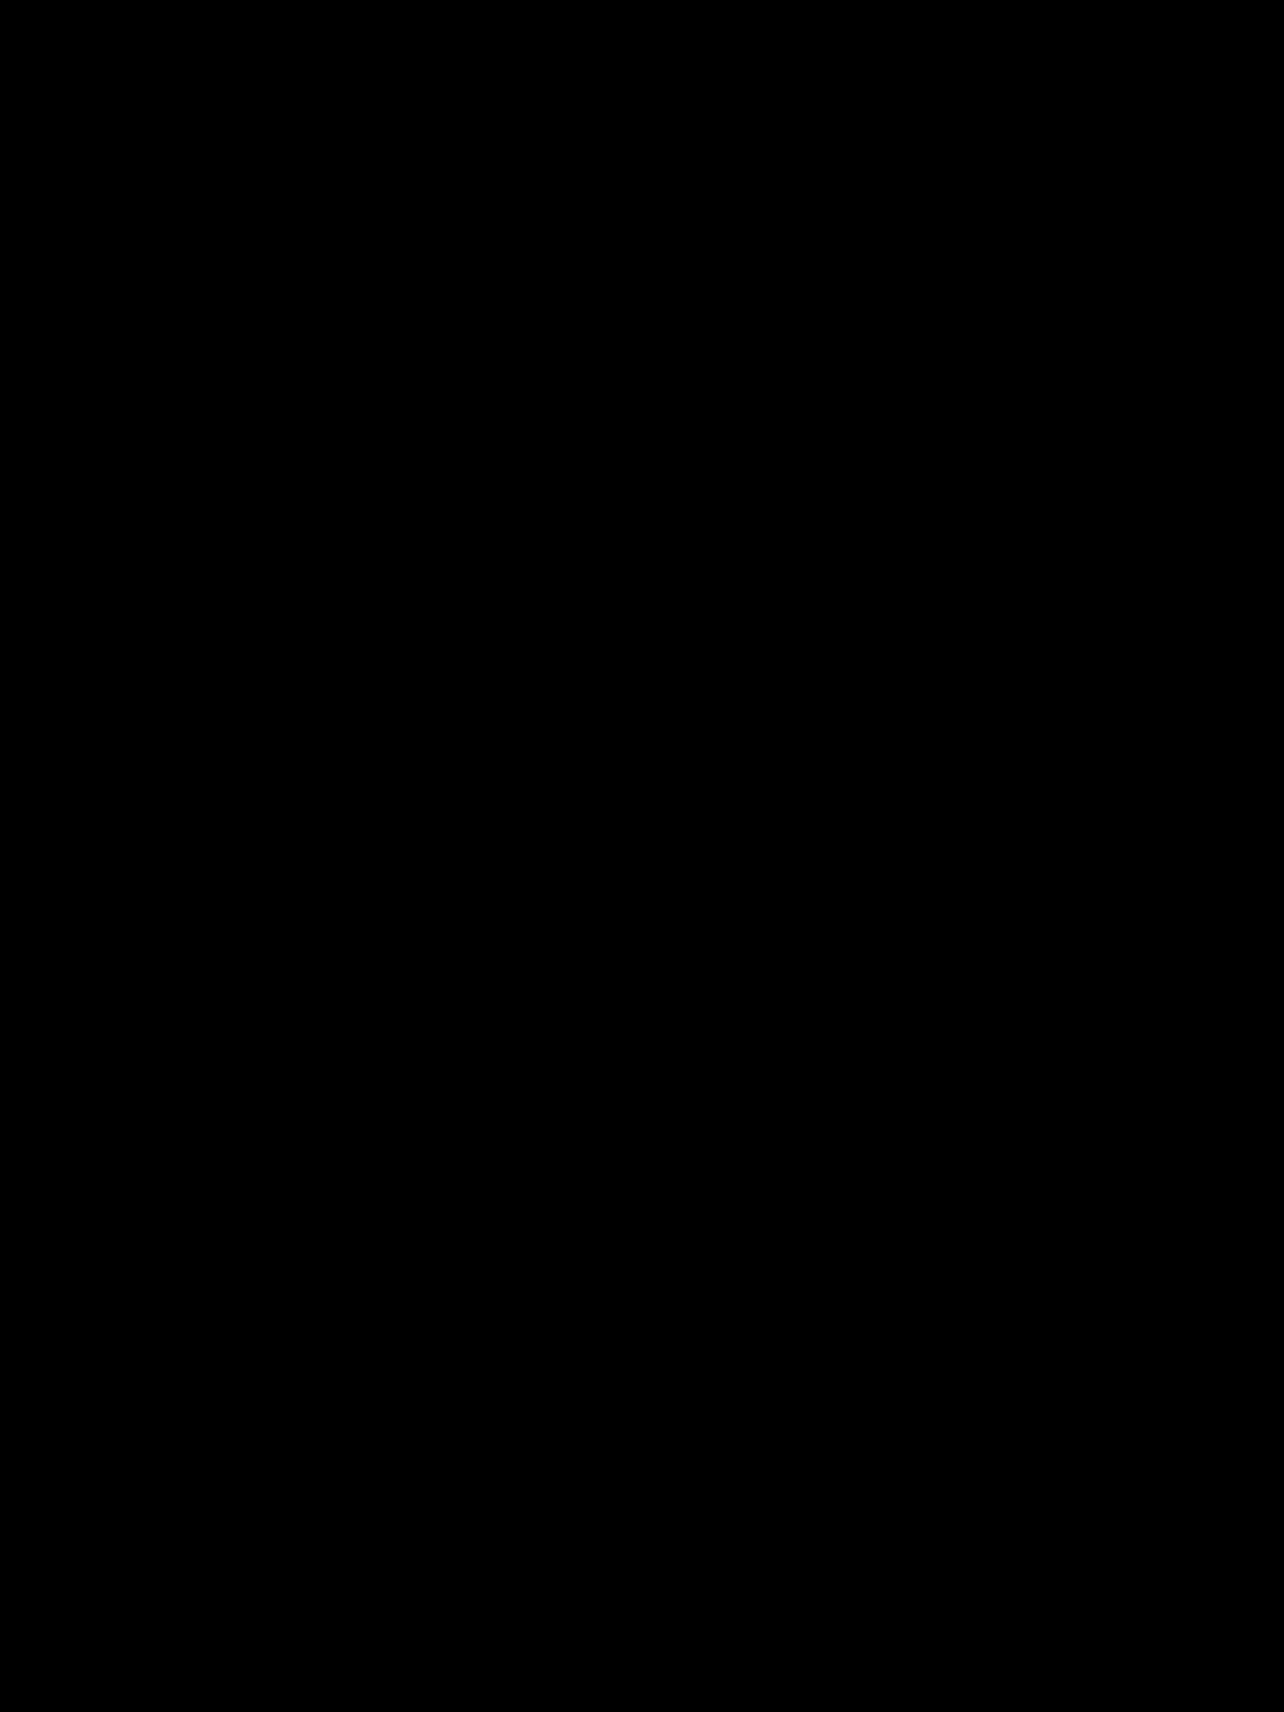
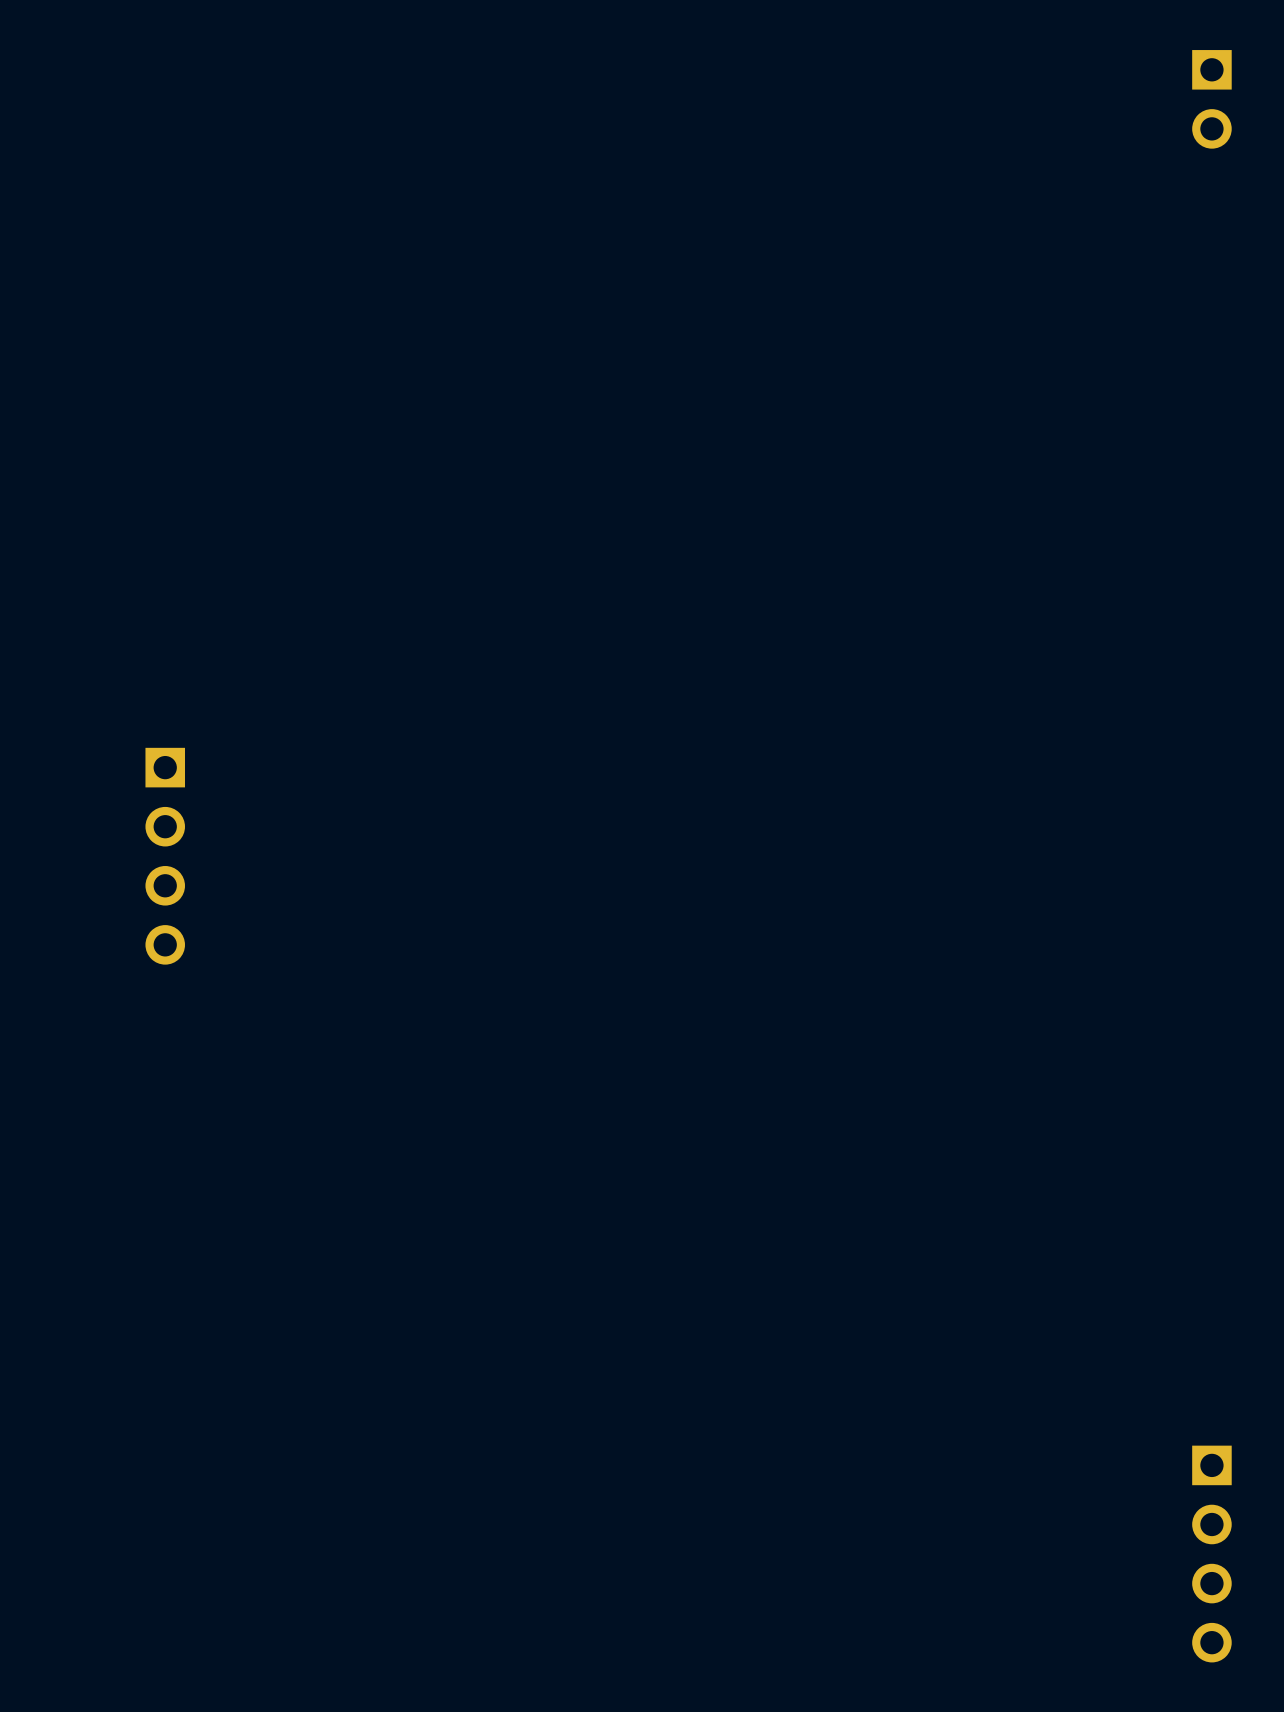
part: none -> (1211, 99)
part: none -> (165, 856)
part: none -> (1211, 1554)

